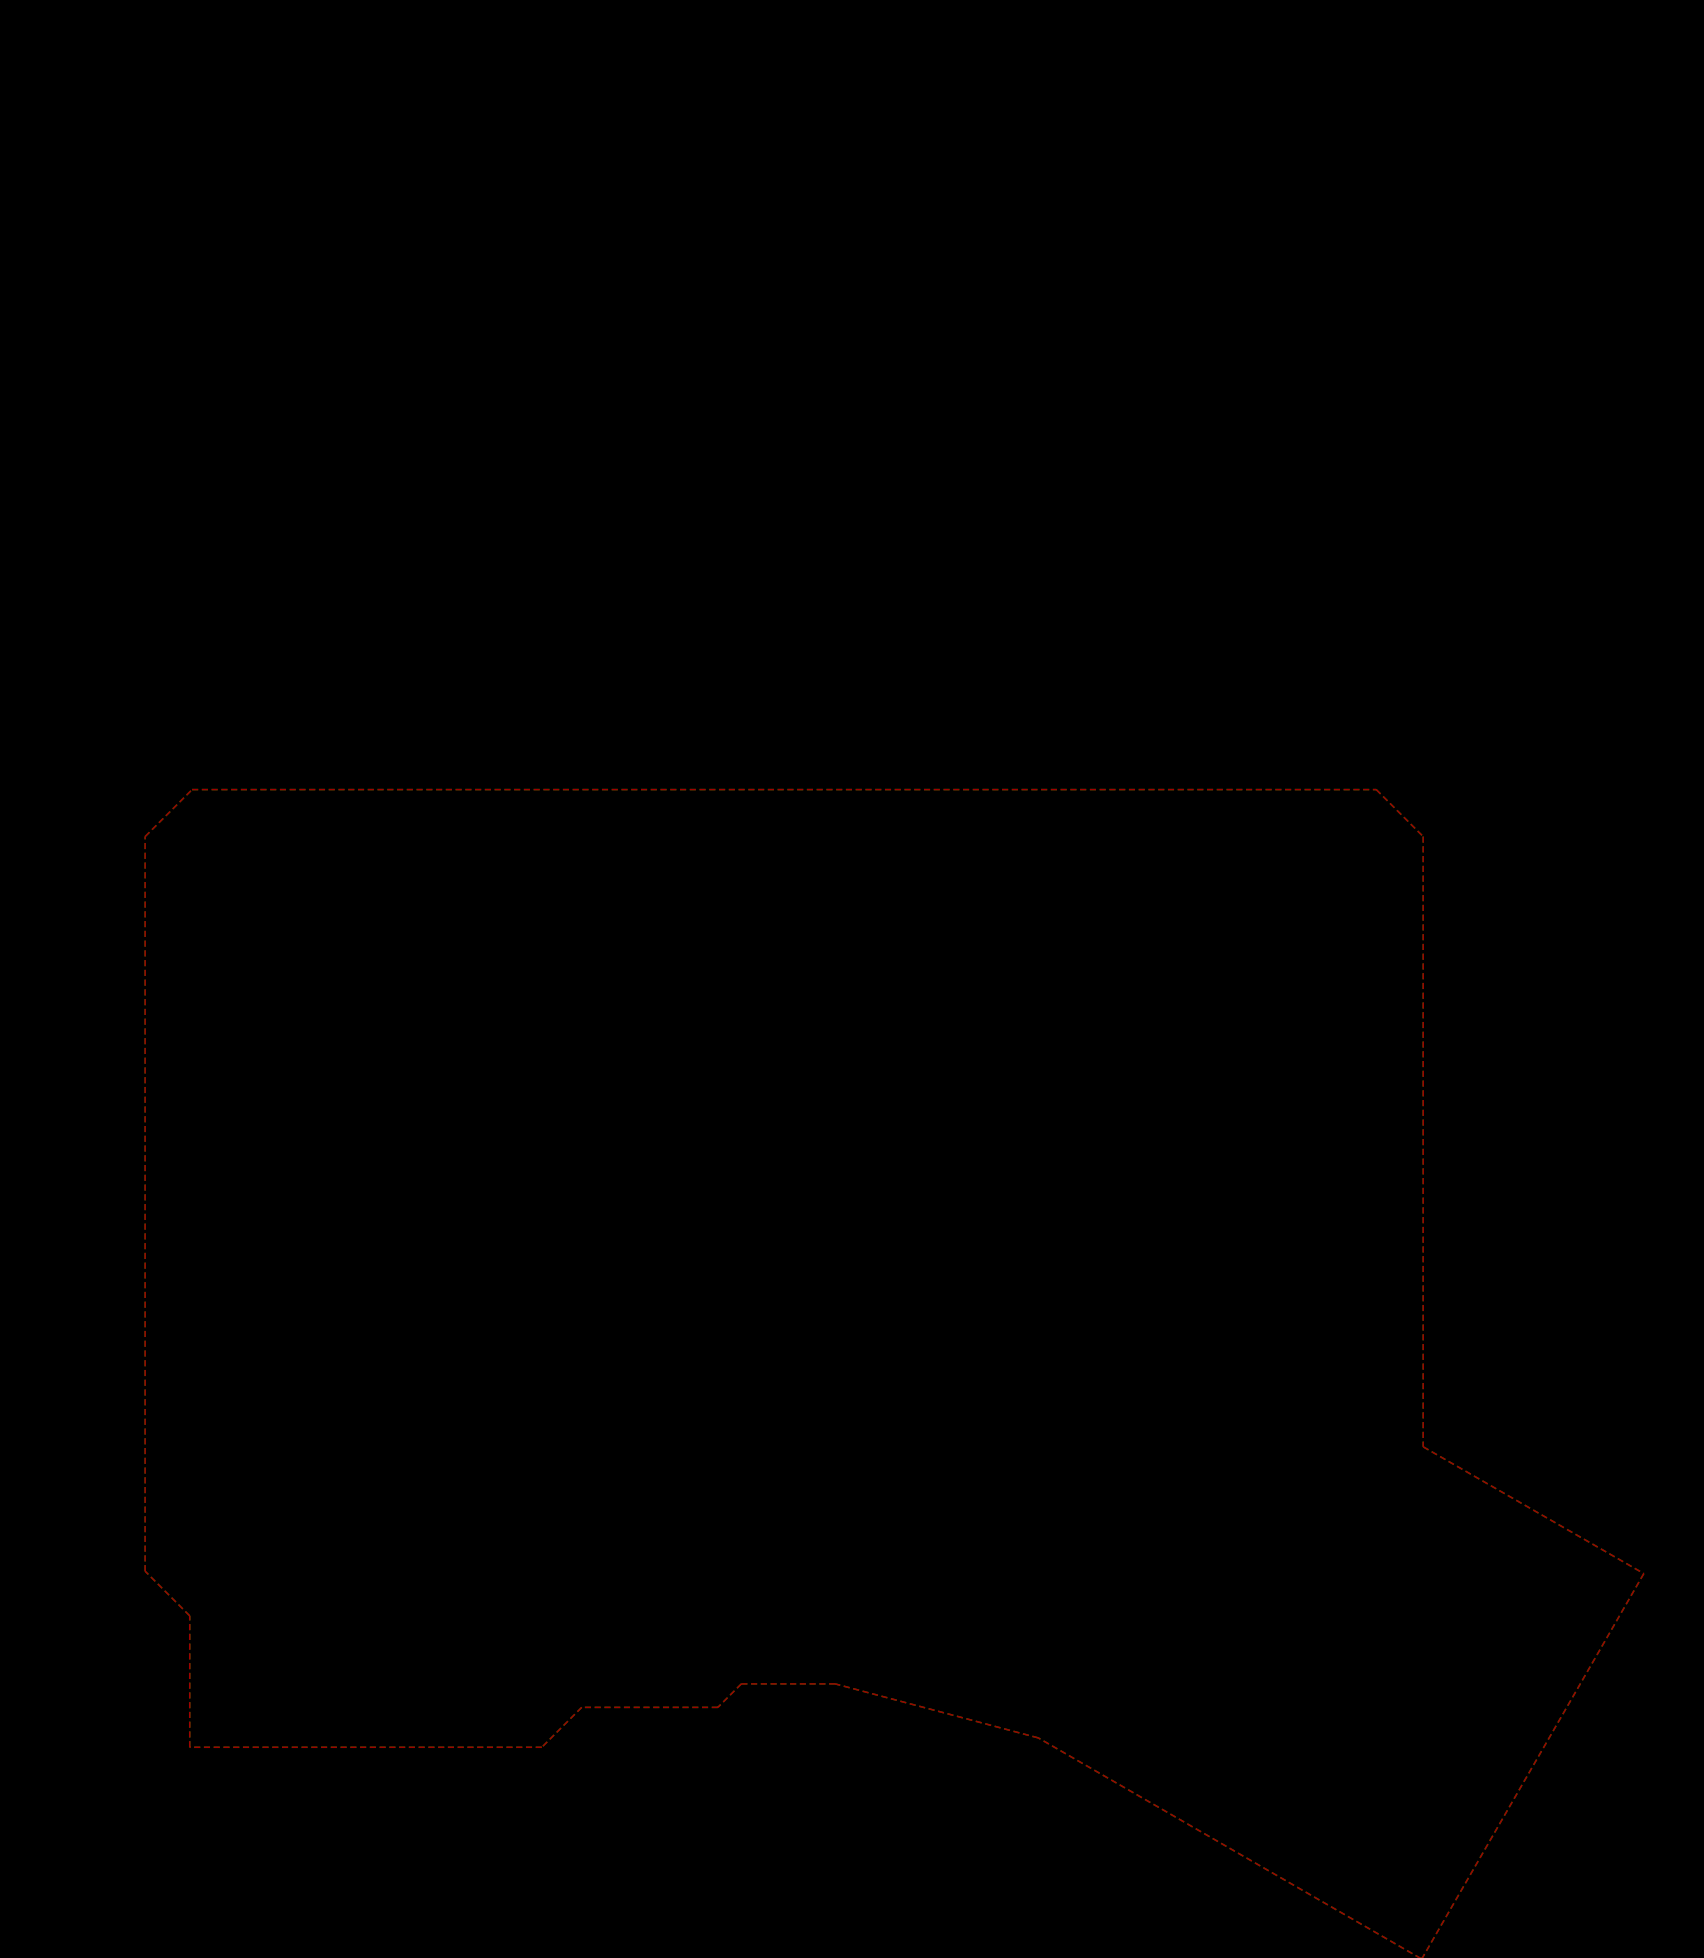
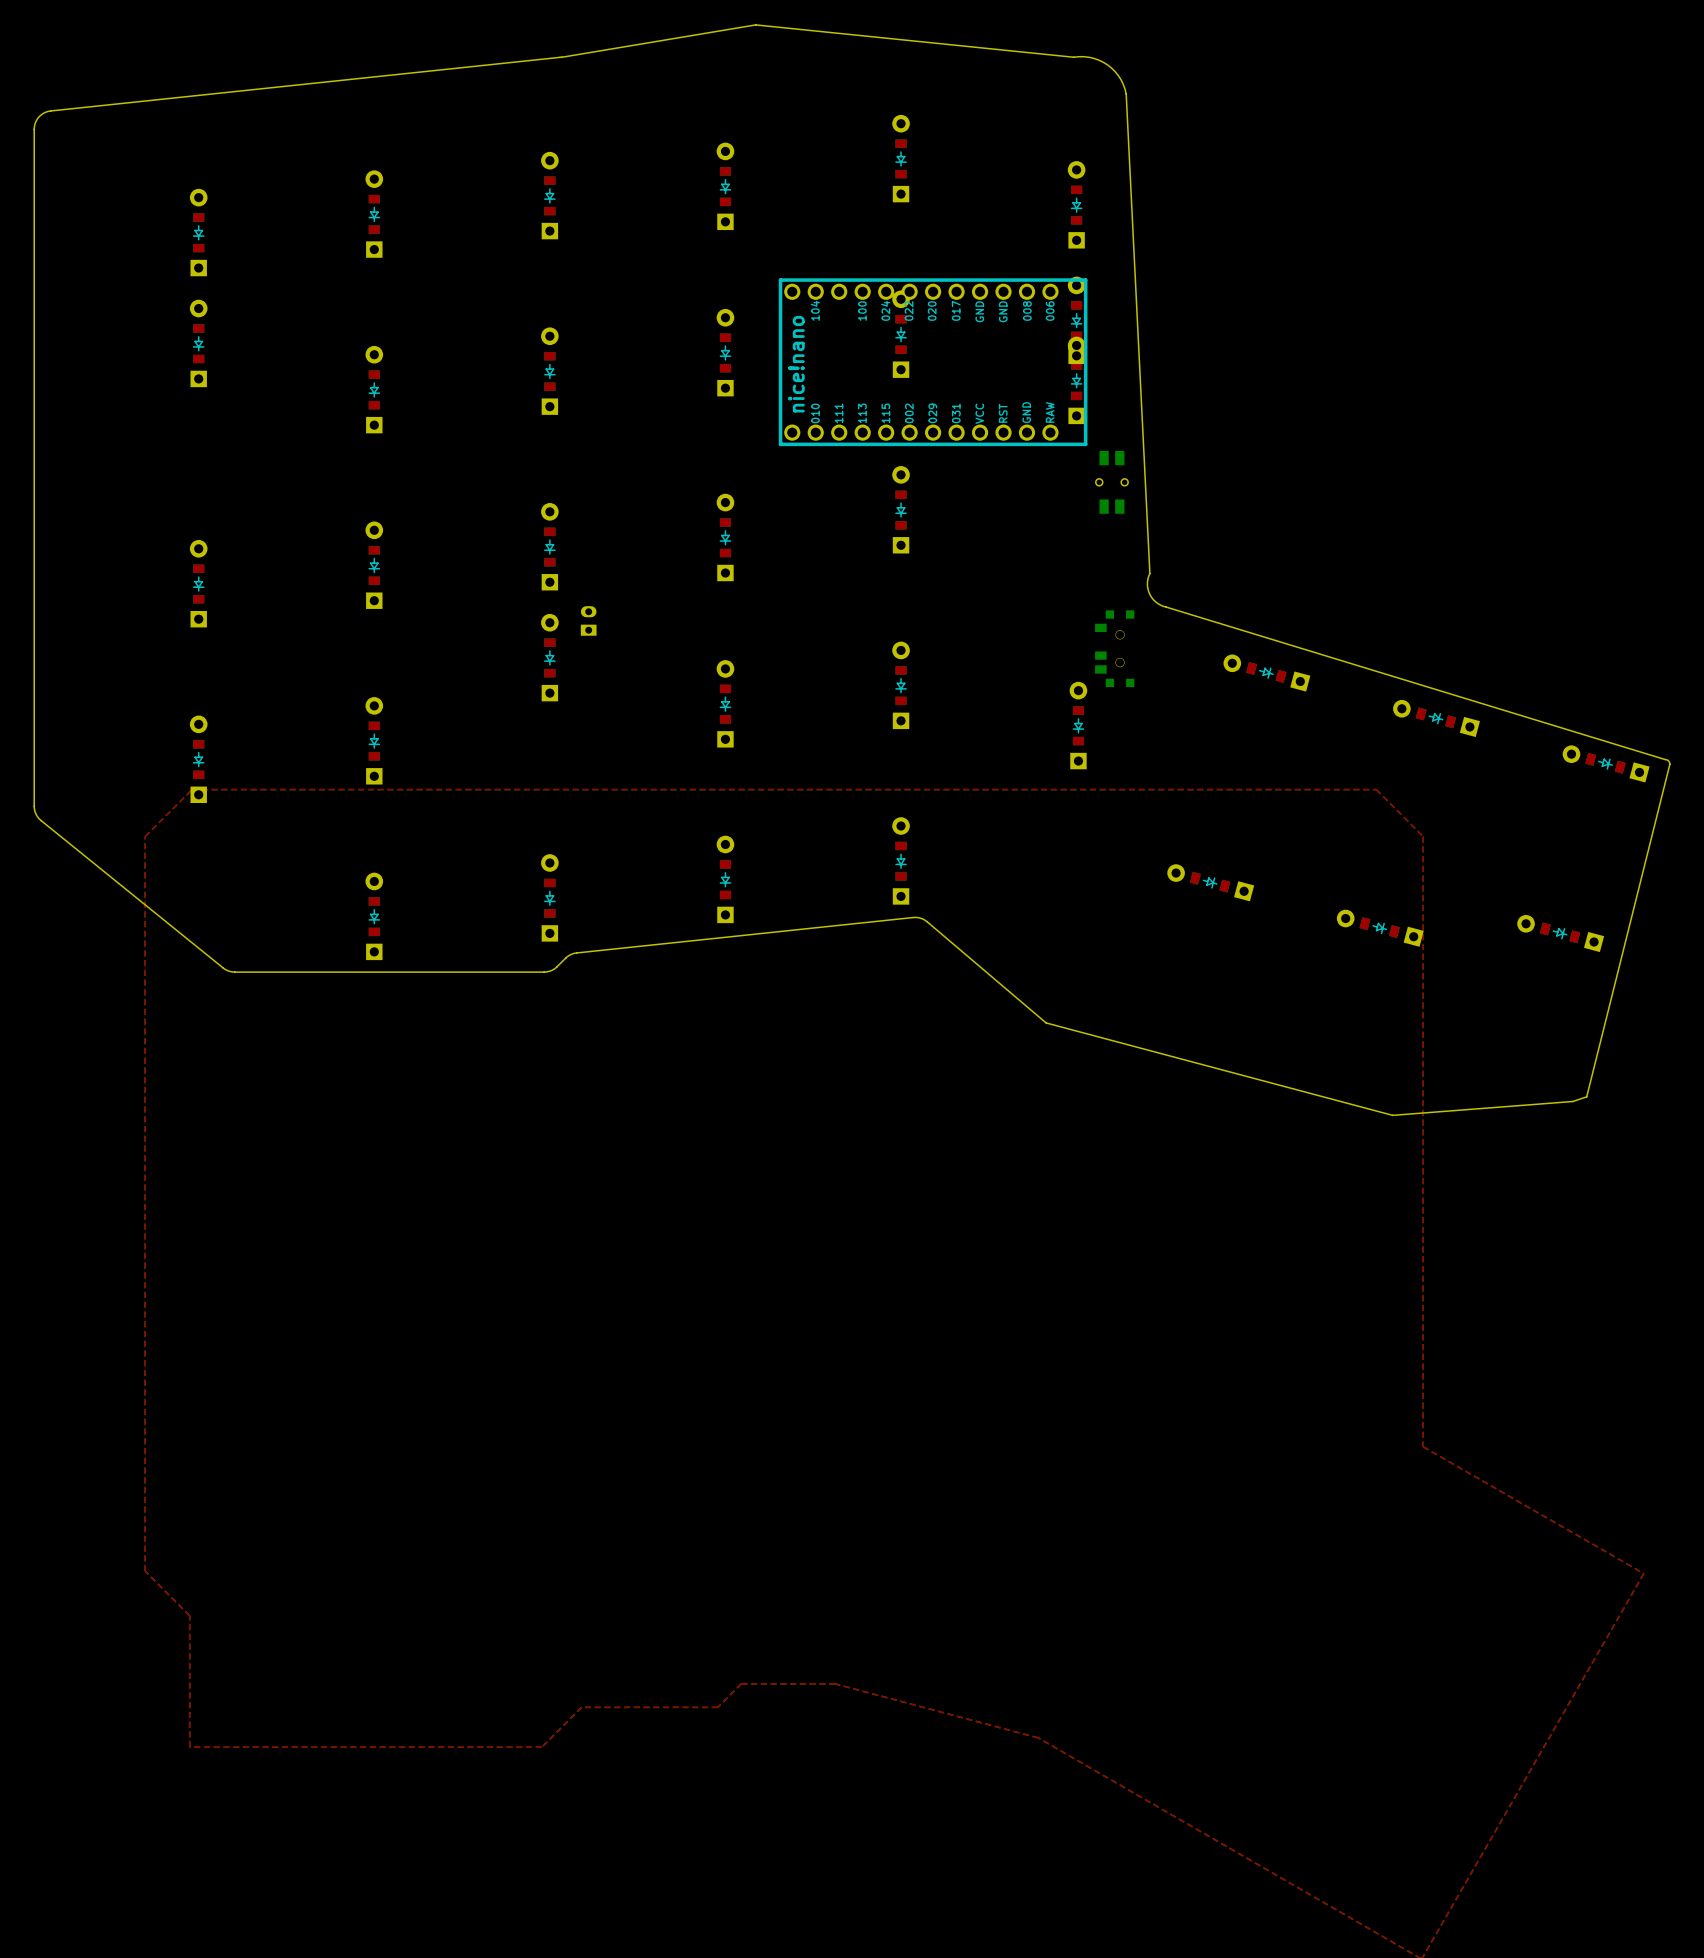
board edge: none -> (755, 24) (1088, 57) (1103, 62) (1118, 75) (1126, 94) (1149, 573) (1147, 585) (1149, 594) (1155, 601) (1163, 606) (1668, 761) (1669, 764) (1586, 1096) (1572, 1101) (1392, 1115) (1046, 1022) (927, 922) (917, 917) (576, 952) (567, 956) (554, 969) (545, 972) (230, 971) (223, 968) (38, 817) (34, 806) (34, 129) (38, 116) (50, 110) (561, 57) (755, 24)
part: none -> (901, 158)
part: none -> (725, 186)
part: none -> (549, 195)
part: none -> (1076, 204)
part: none -> (374, 214)
part: none -> (198, 232)
part: none -> (1076, 320)
part: none -> (901, 334)
part: none -> (198, 343)
part: none -> (725, 352)
part: none -> (933, 362)
part: none -> (549, 371)
part: none -> (1076, 380)
part: none -> (374, 389)
part: none -> (1111, 482)
part: none -> (901, 509)
part: none -> (725, 537)
part: none -> (549, 546)
part: none -> (374, 565)
part: none -> (198, 583)
part: none -> (588, 620)
part: none -> (1114, 648)
part: none -> (549, 657)
part: none -> (1266, 673)
part: none -> (901, 685)
part: none -> (725, 703)
part: none -> (1436, 718)
part: none -> (1078, 725)
part: none -> (374, 740)
part: none -> (198, 759)
part: none -> (1606, 763)
part: none -> (901, 860)
part: none -> (725, 879)
part: none -> (1210, 882)
part: none -> (549, 897)
part: none -> (374, 916)
part: none -> (1380, 928)
part: none -> (1560, 933)

